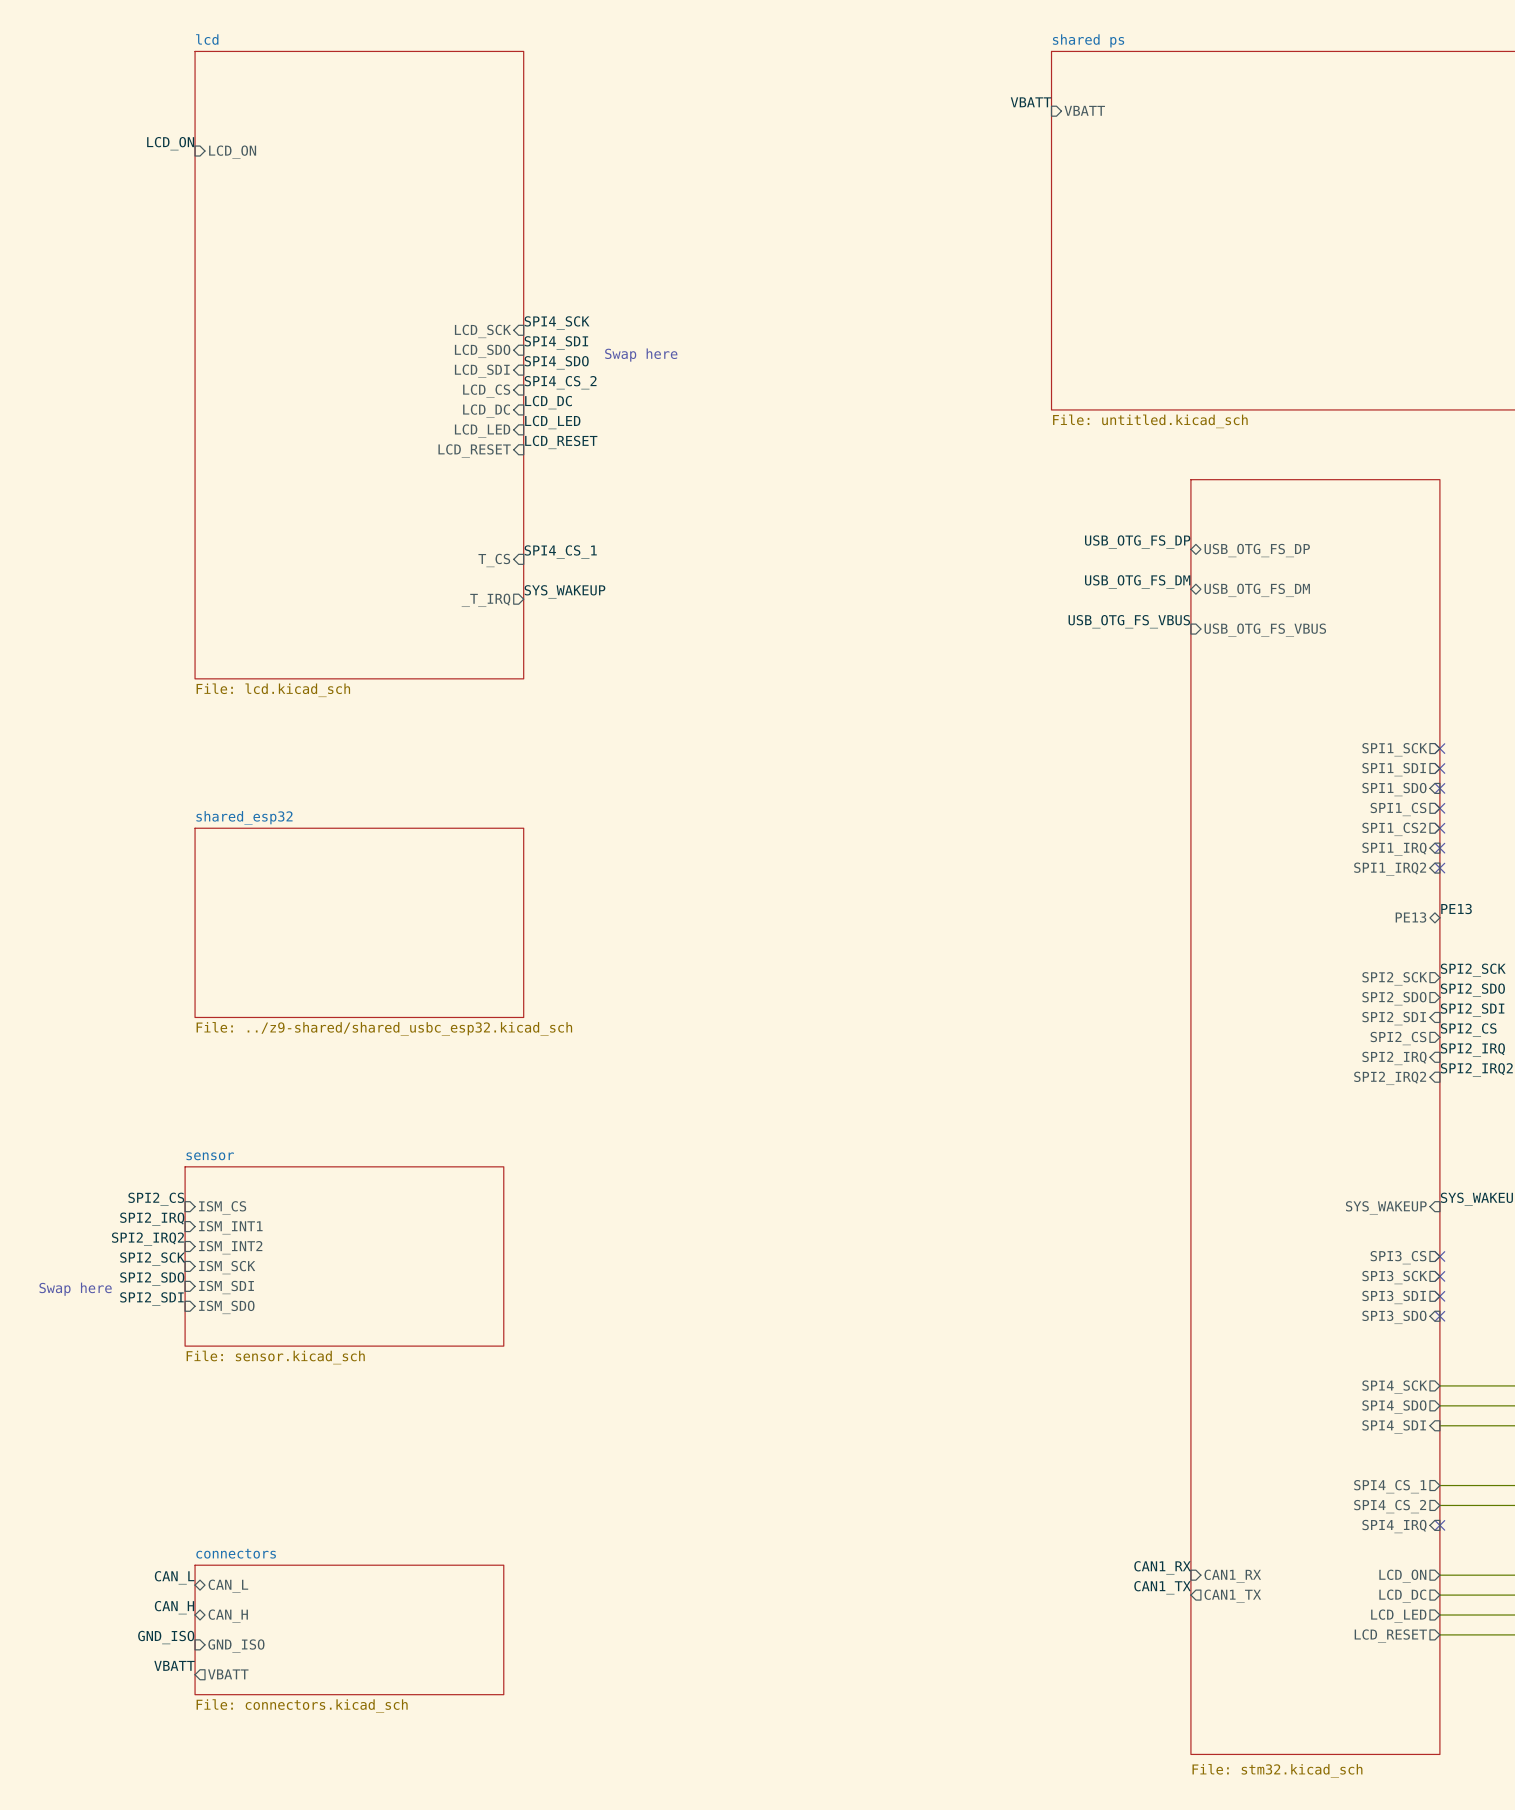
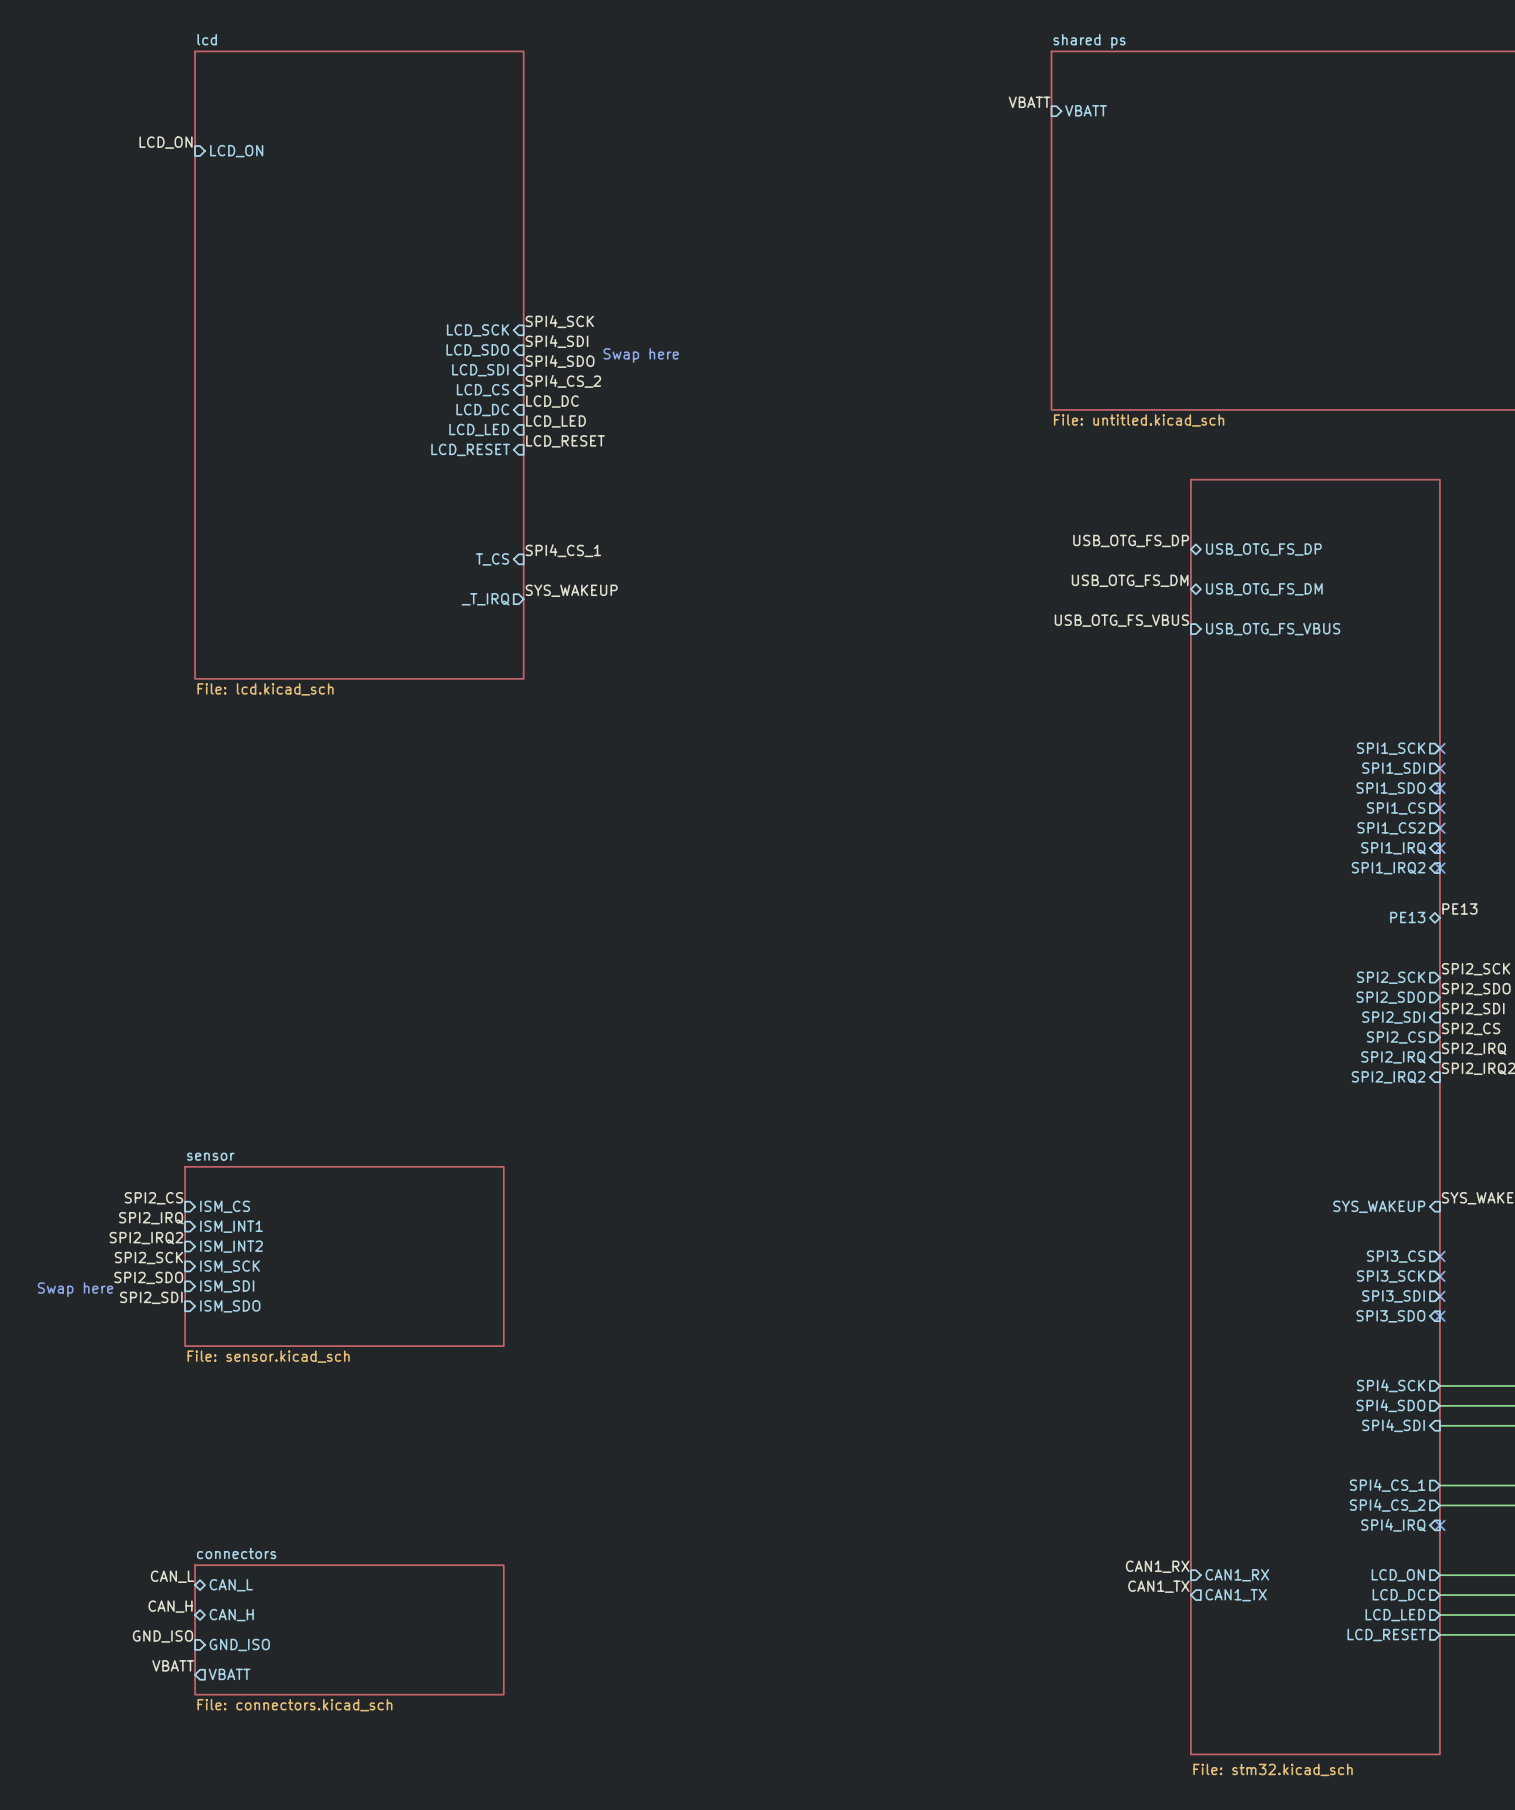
sheet shared_esp32: File: ../z9-shared/shared_usbc_esp32.kicad_sch (359, 922) -> none

